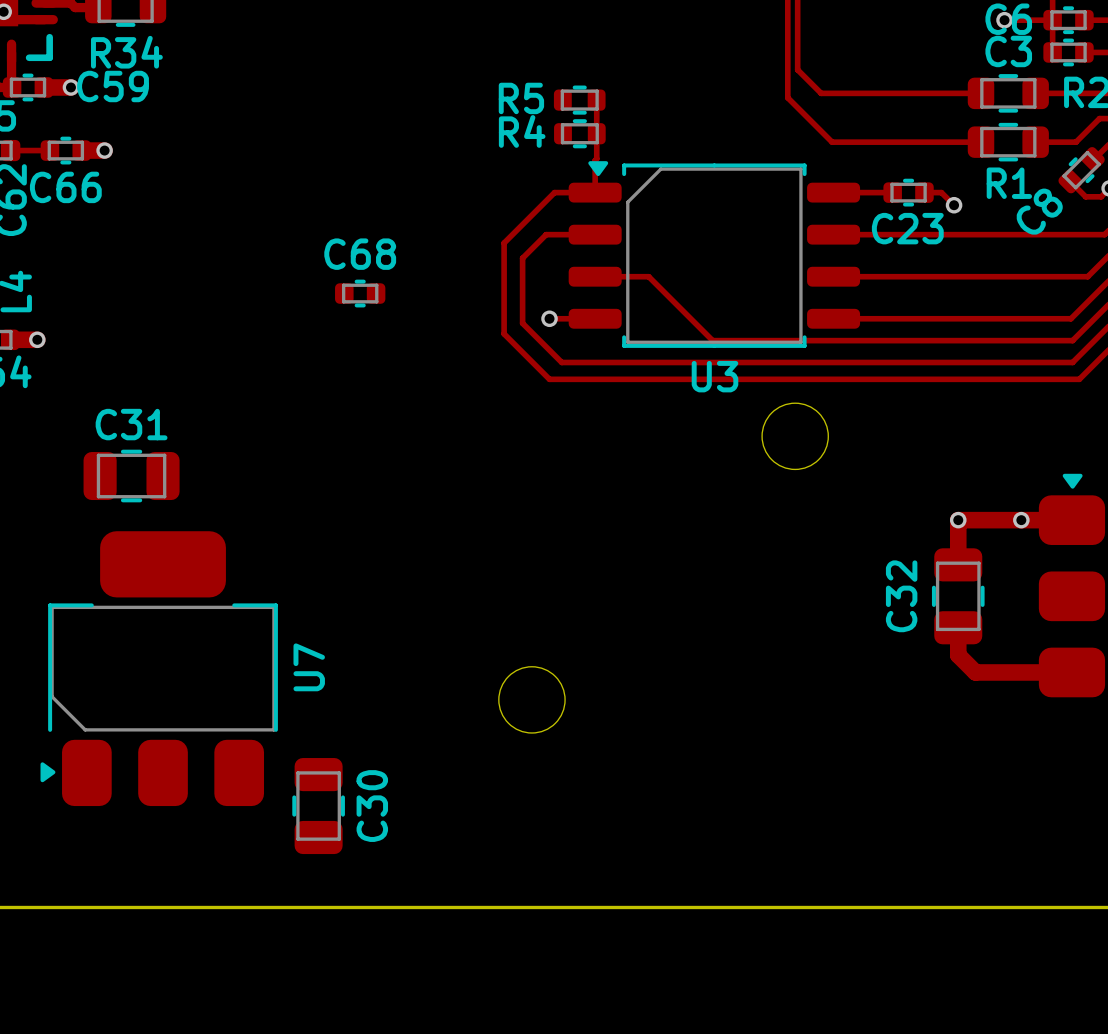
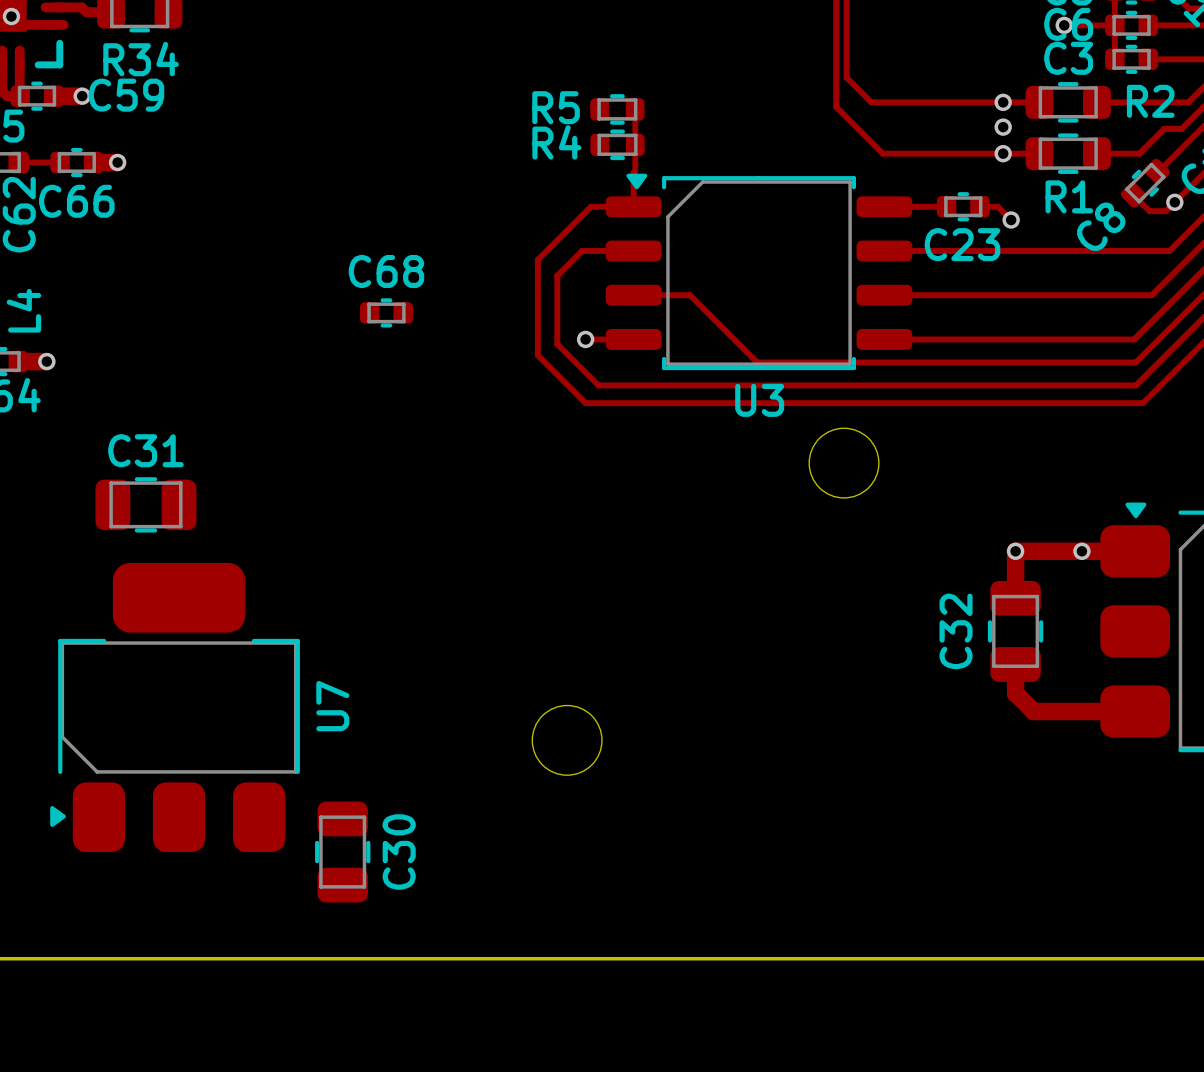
via: none -> (1003, 102)
via: none -> (1003, 127)
via: none -> (1003, 153)

